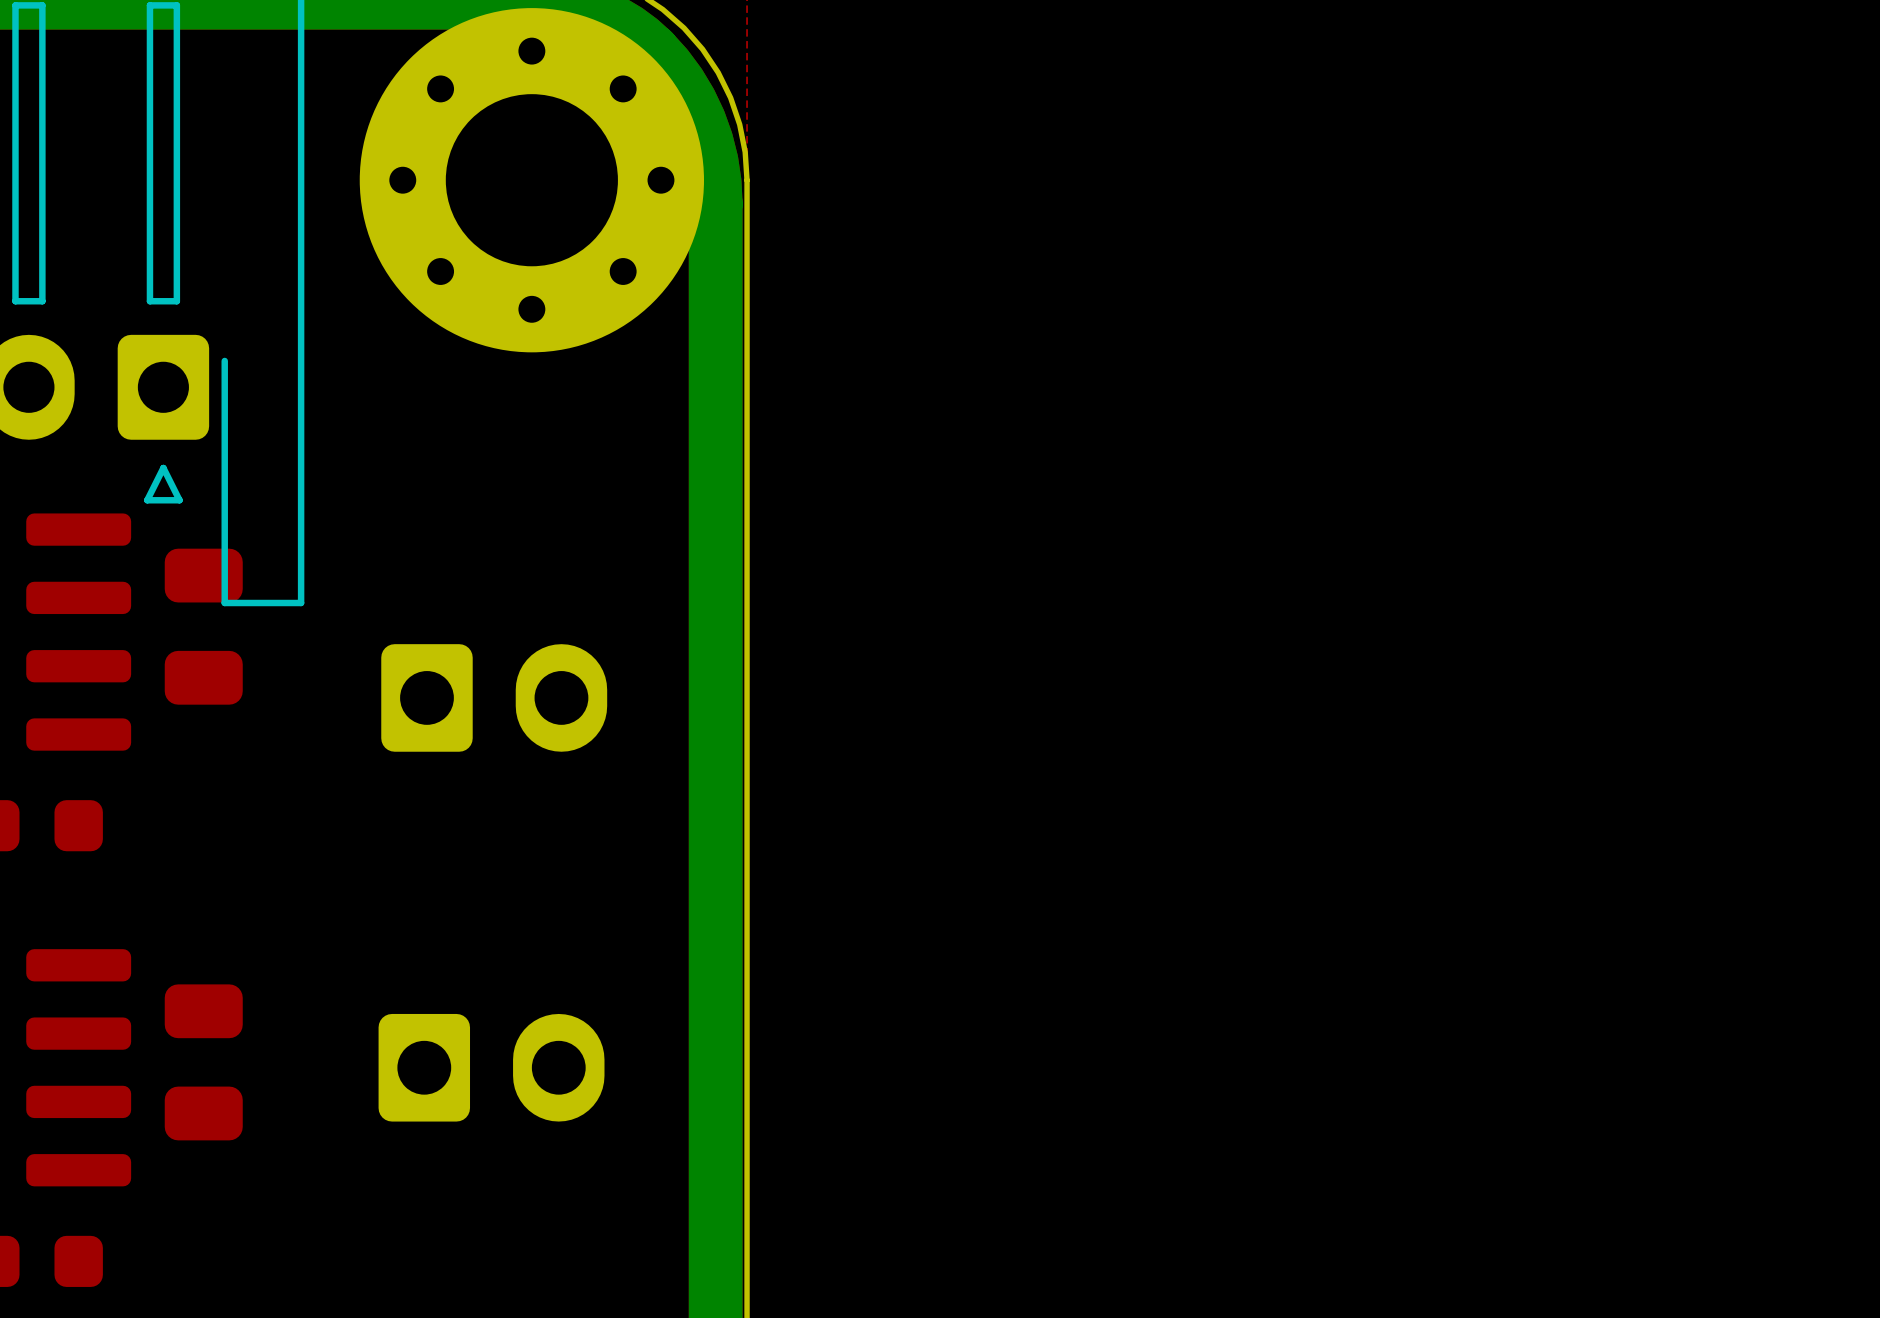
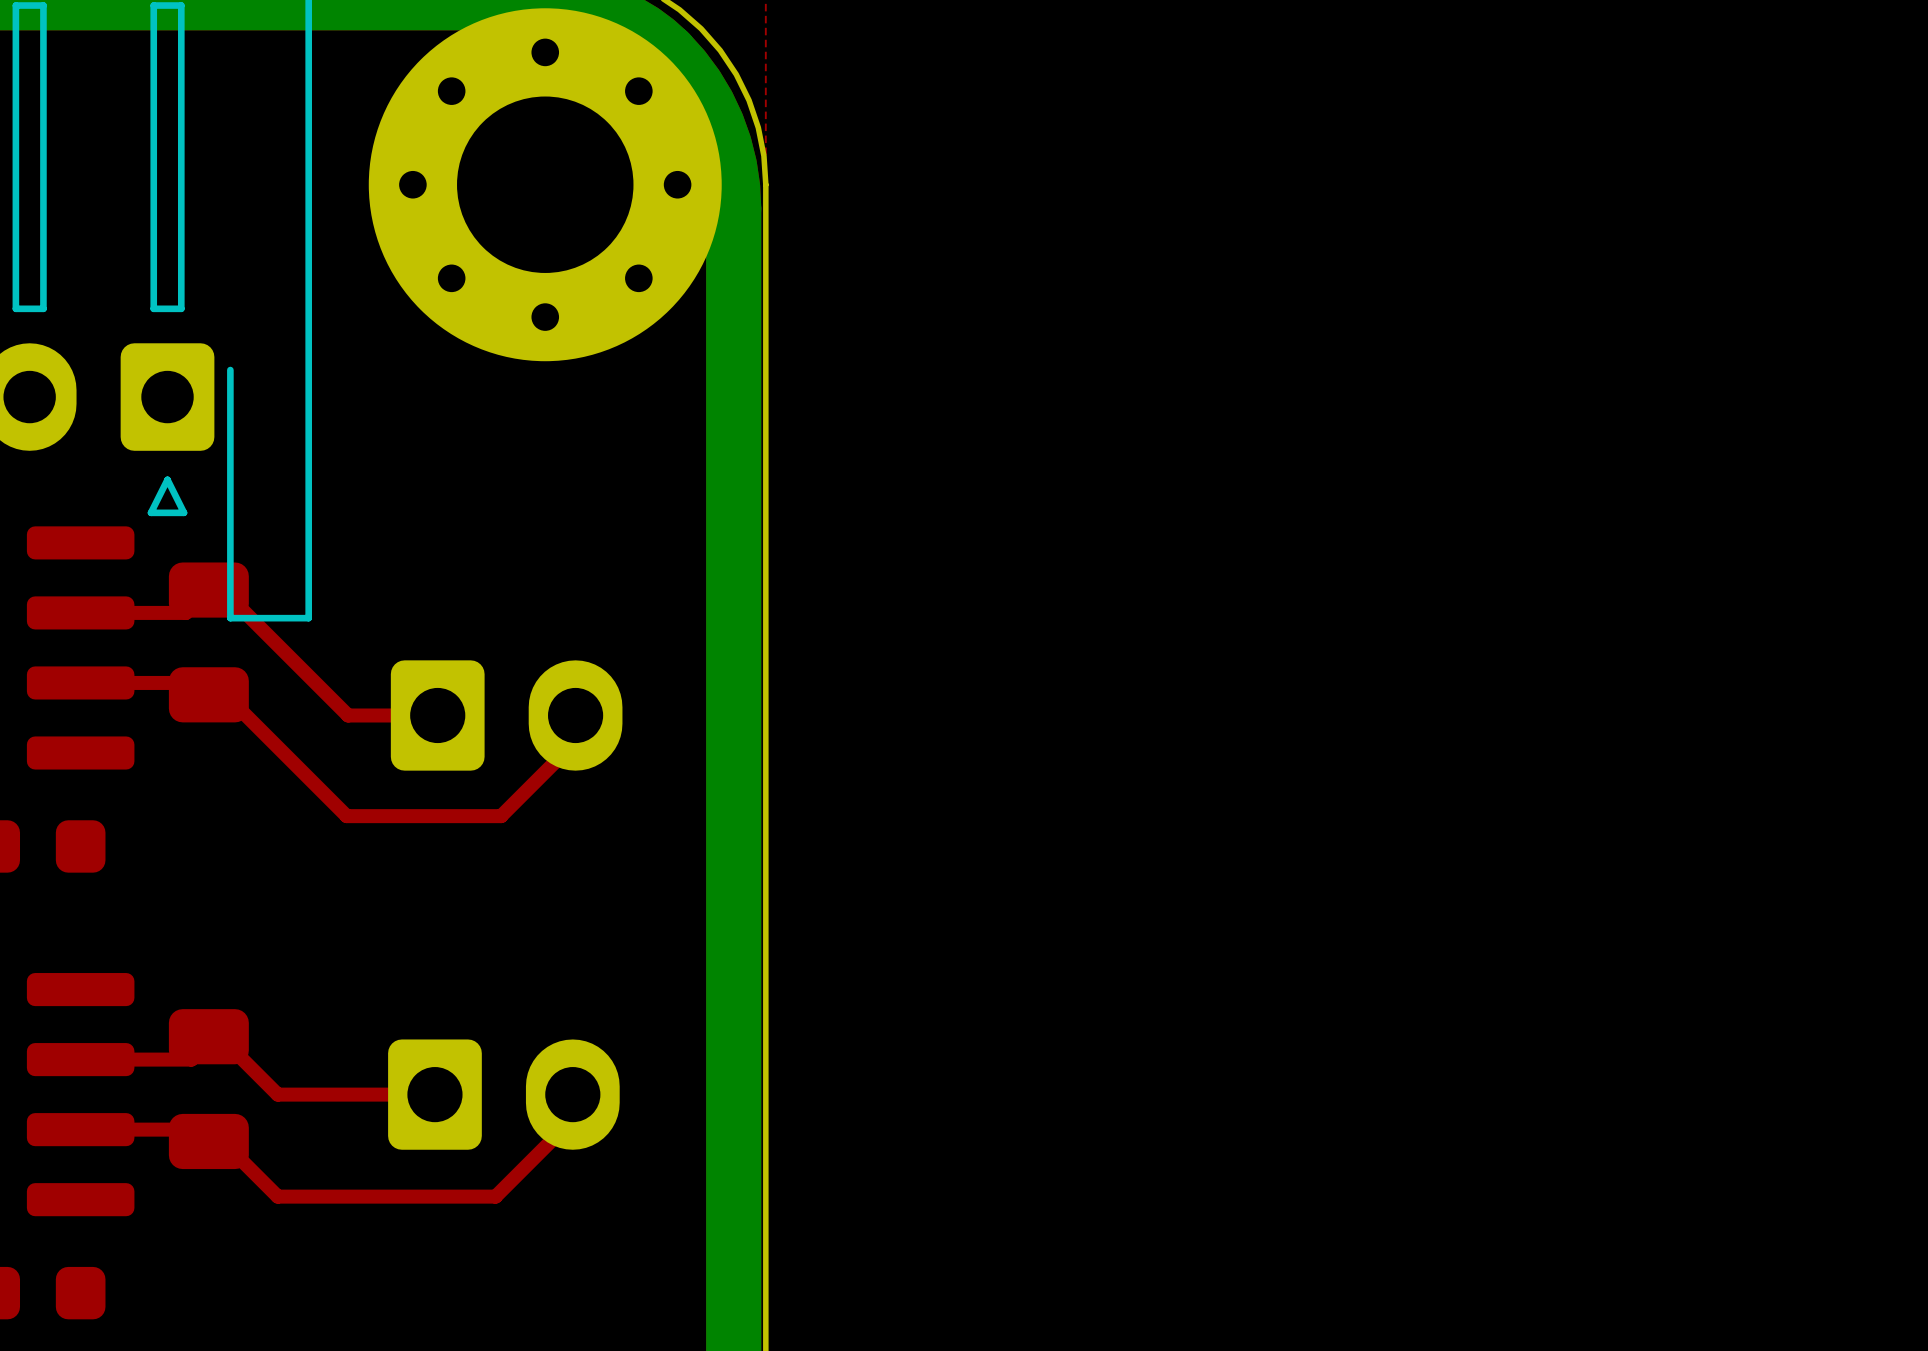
top track: none -> (80, 612) (185, 612) (208, 590) (222, 590) (348, 715) (437, 715)
top track: none -> (80, 682) (197, 682) (208, 694) (225, 694) (346, 816) (501, 816) (575, 741) (575, 715)
top track: none -> (80, 1059) (191, 1059) (208, 1042) (225, 1042) (277, 1094) (434, 1094)
top track: none -> (572, 1094) (572, 1119) (495, 1196) (277, 1196) (228, 1146) (208, 1146) (191, 1129) (80, 1129)

